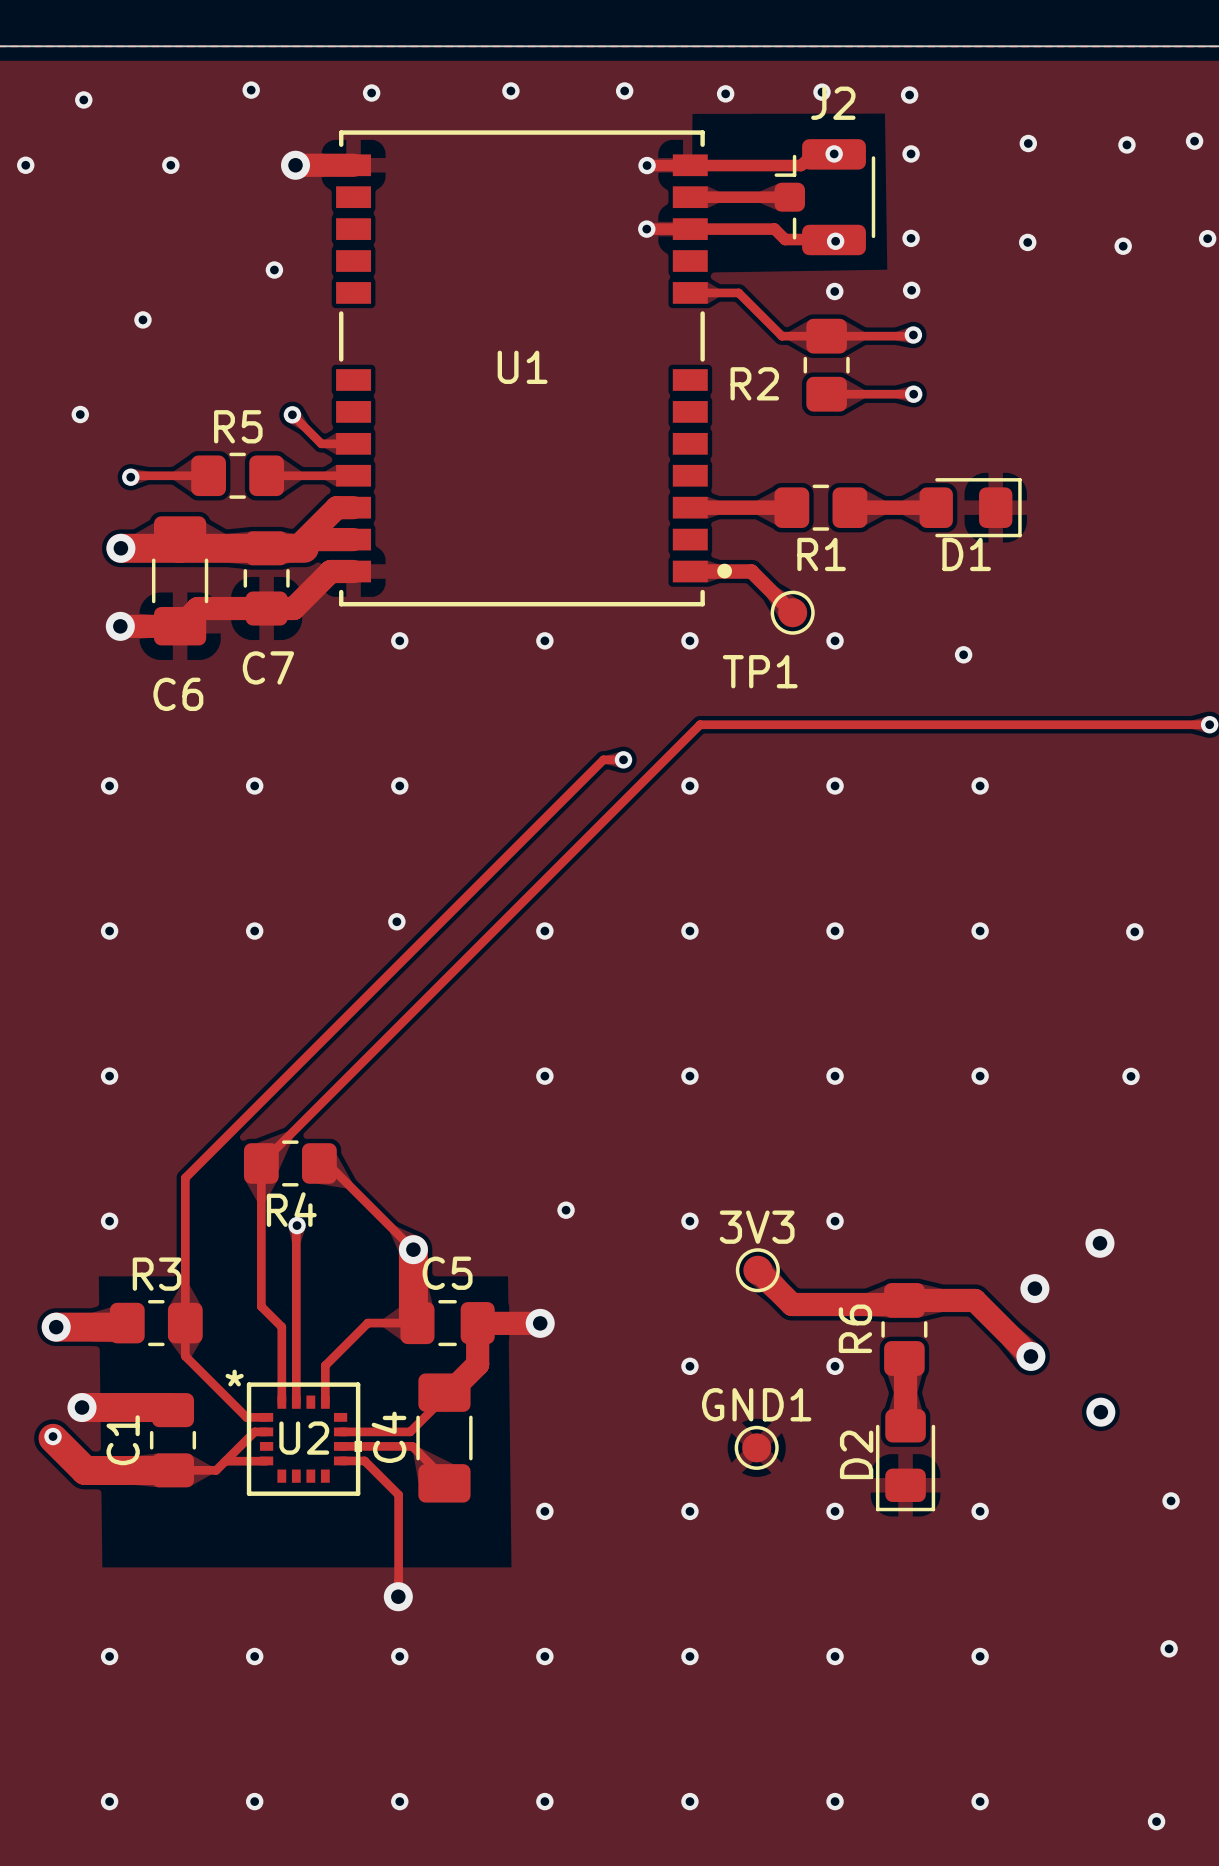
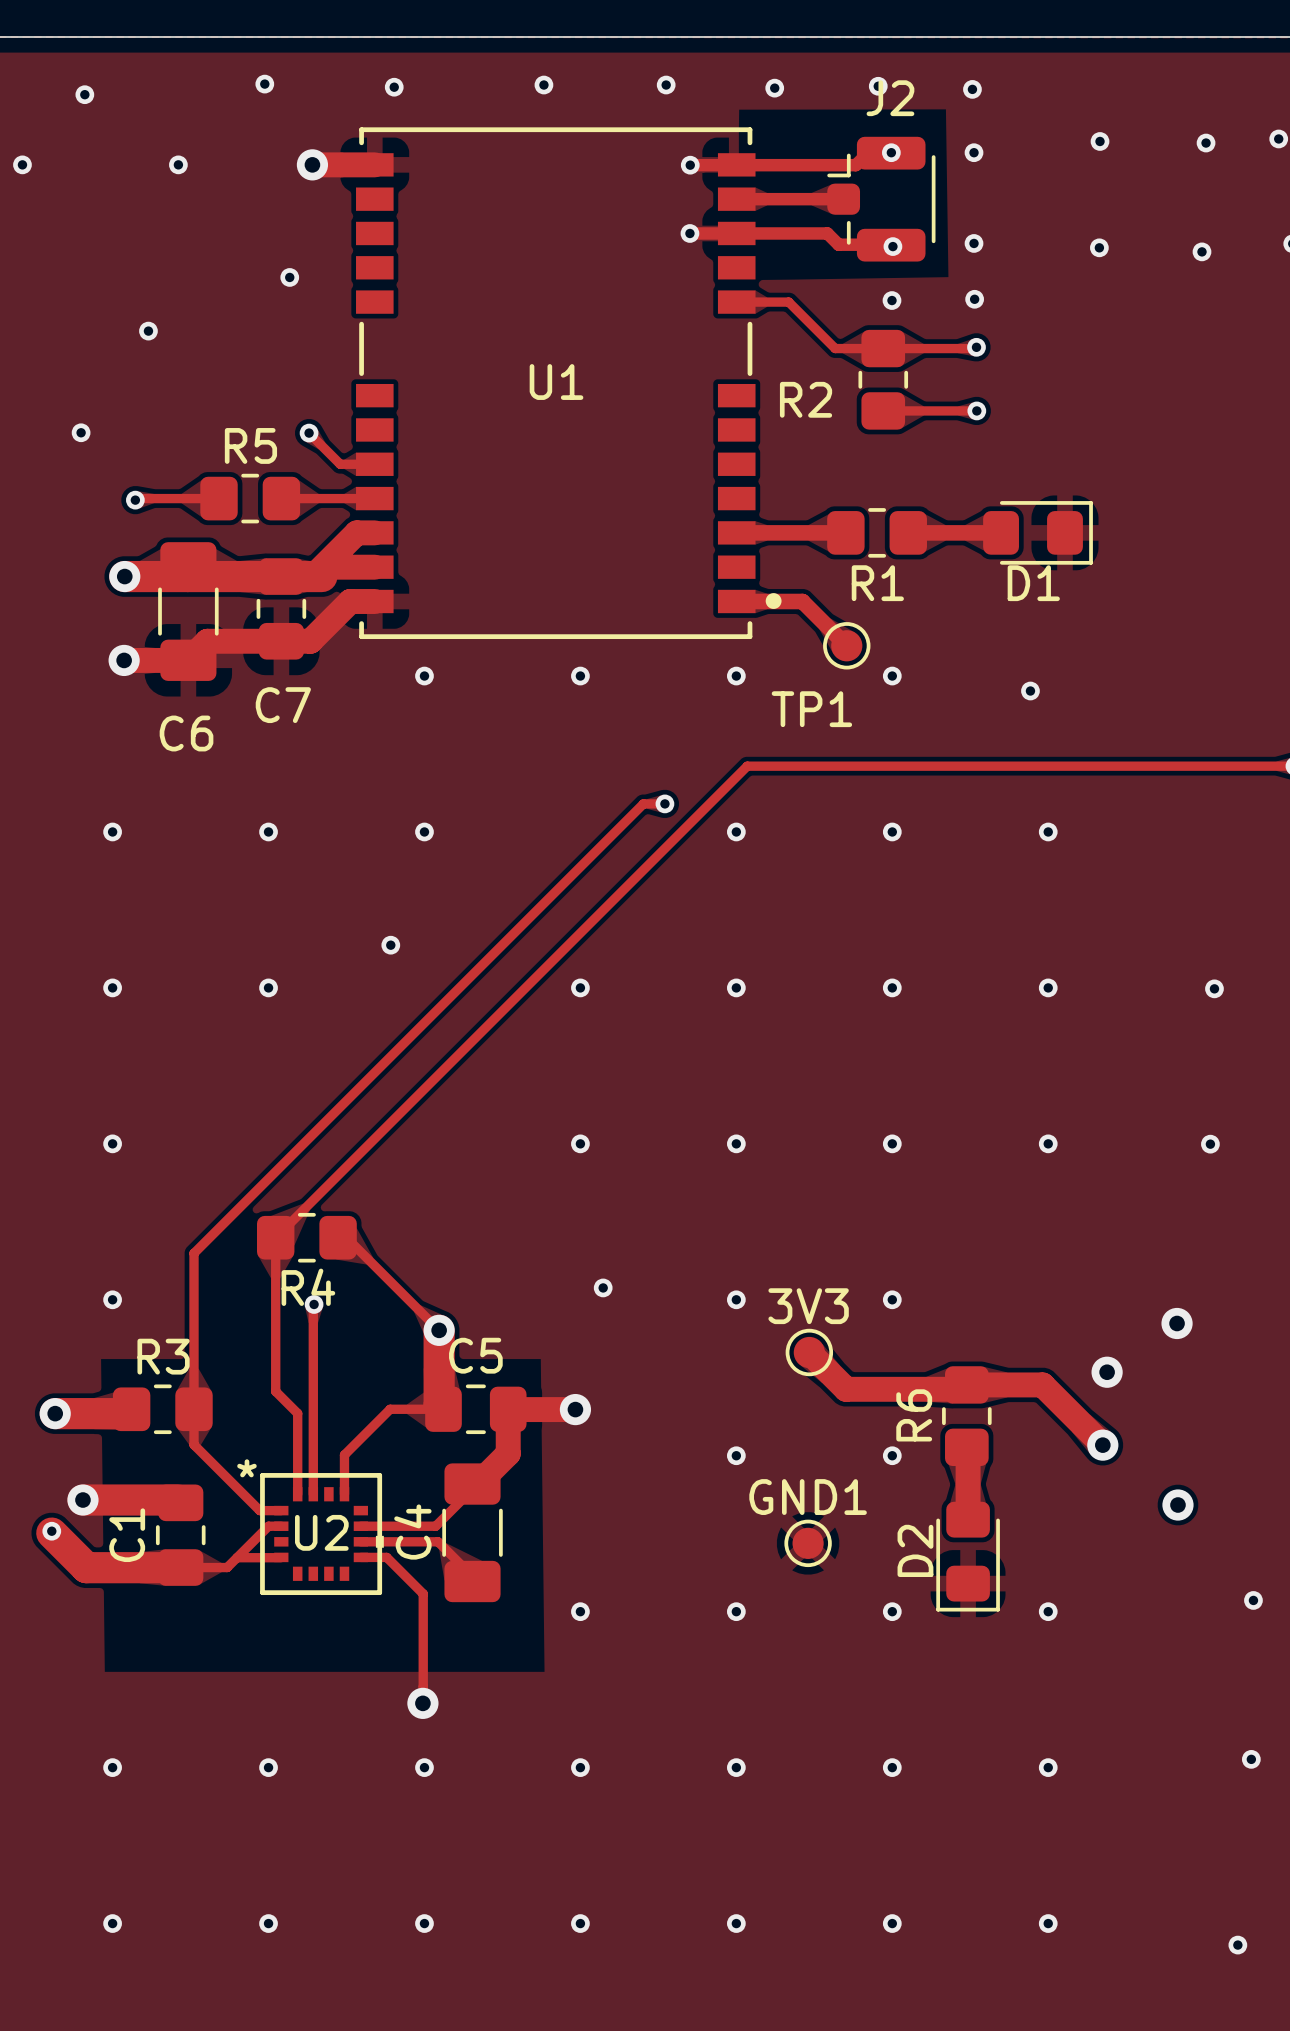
via position: (396, 921) -> (390, 945)

